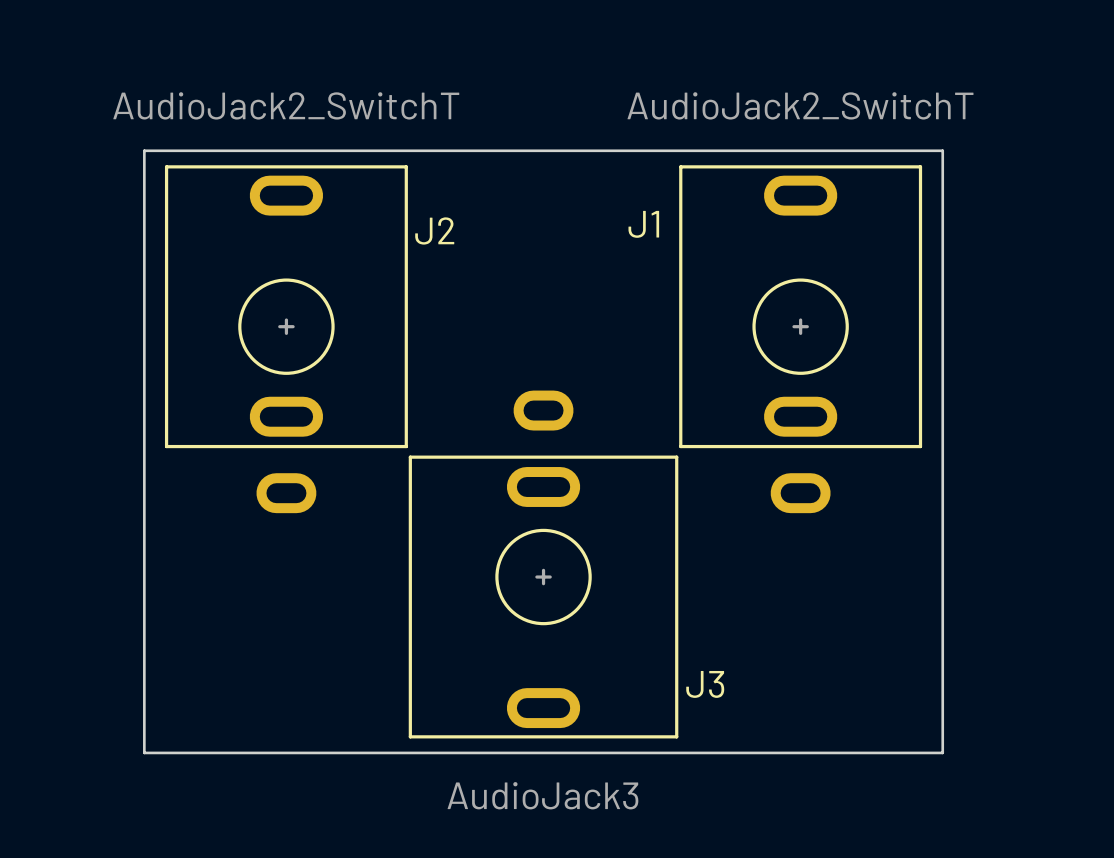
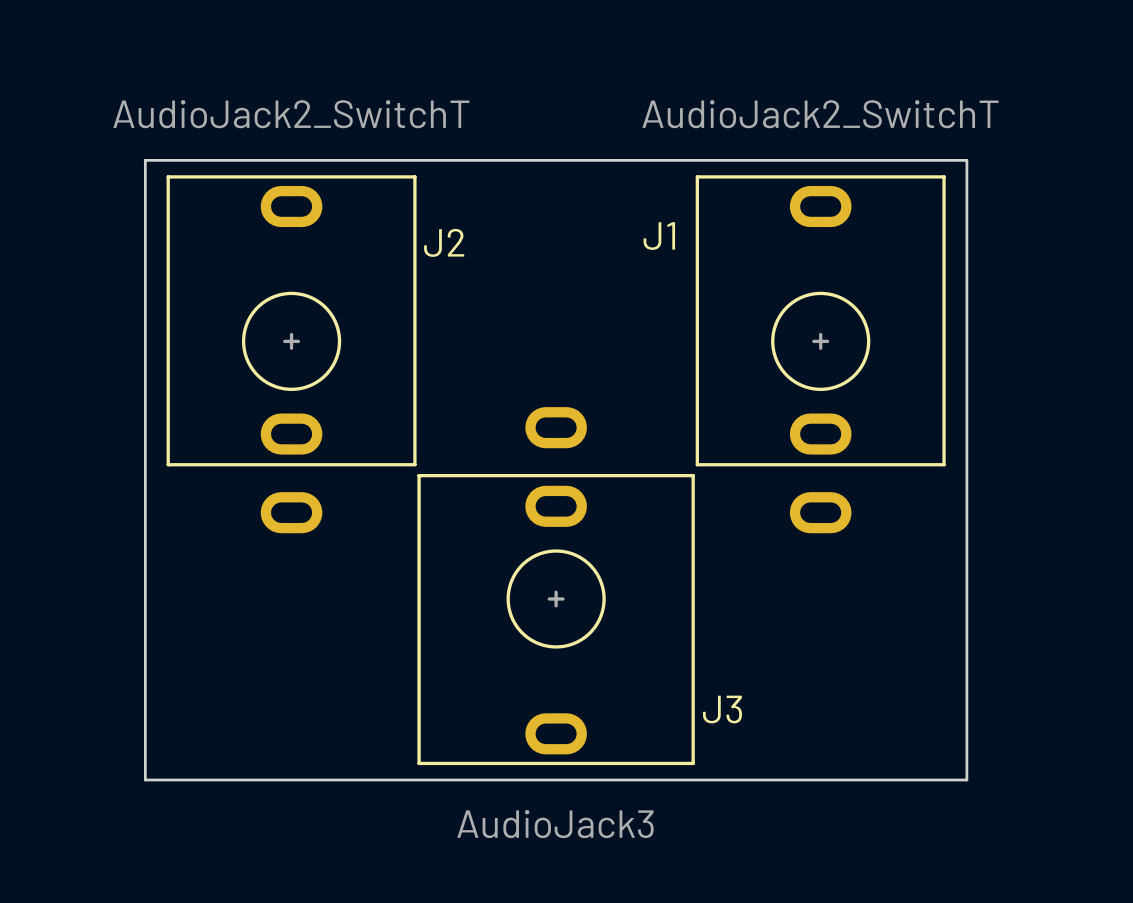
J2 footprint: [164, 165, 408, 514] -> [166, 175, 417, 534]
J1 footprint: [679, 165, 923, 514] -> [695, 175, 946, 534]
J3 footprint: [408, 390, 679, 739] -> [417, 407, 695, 766]

